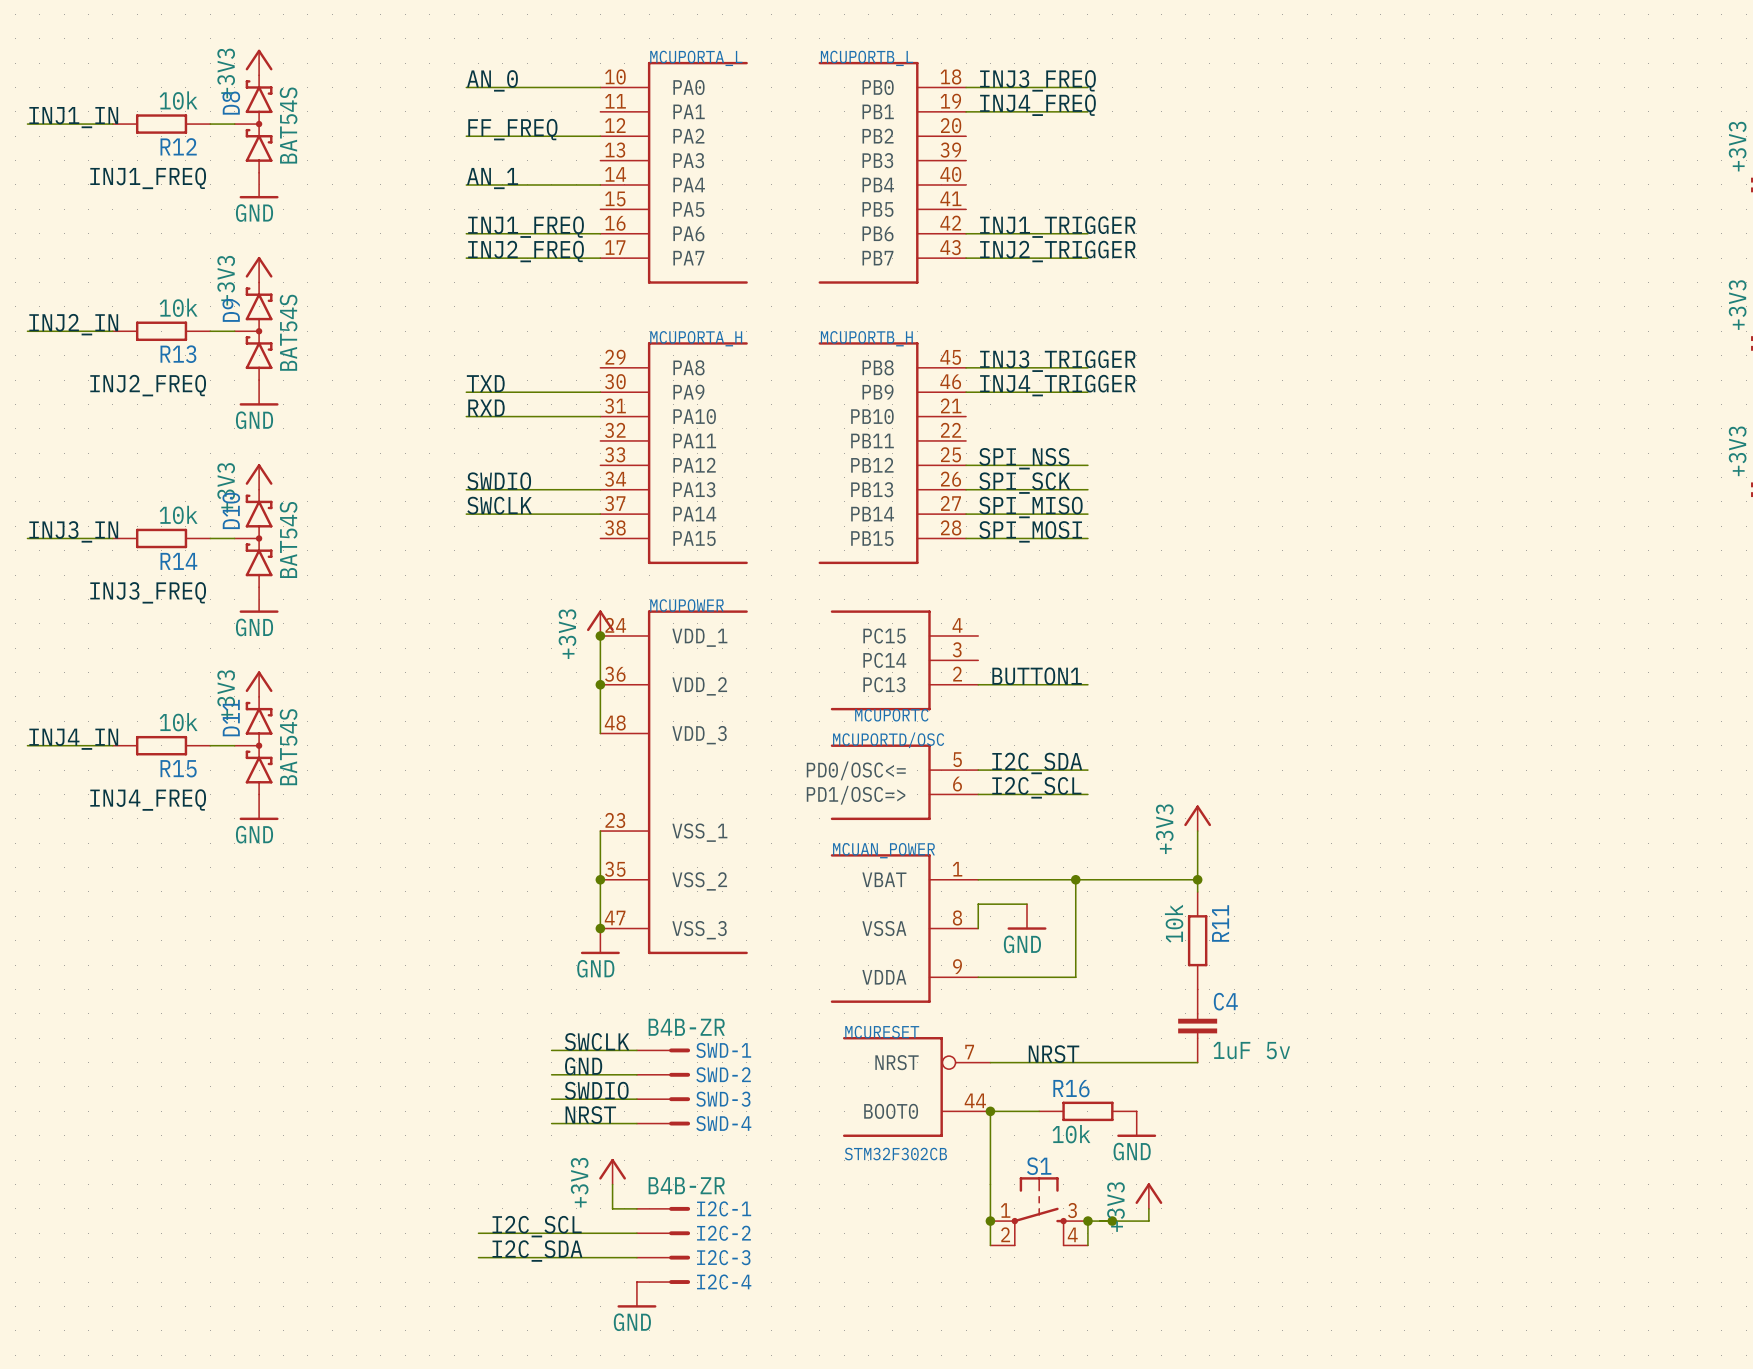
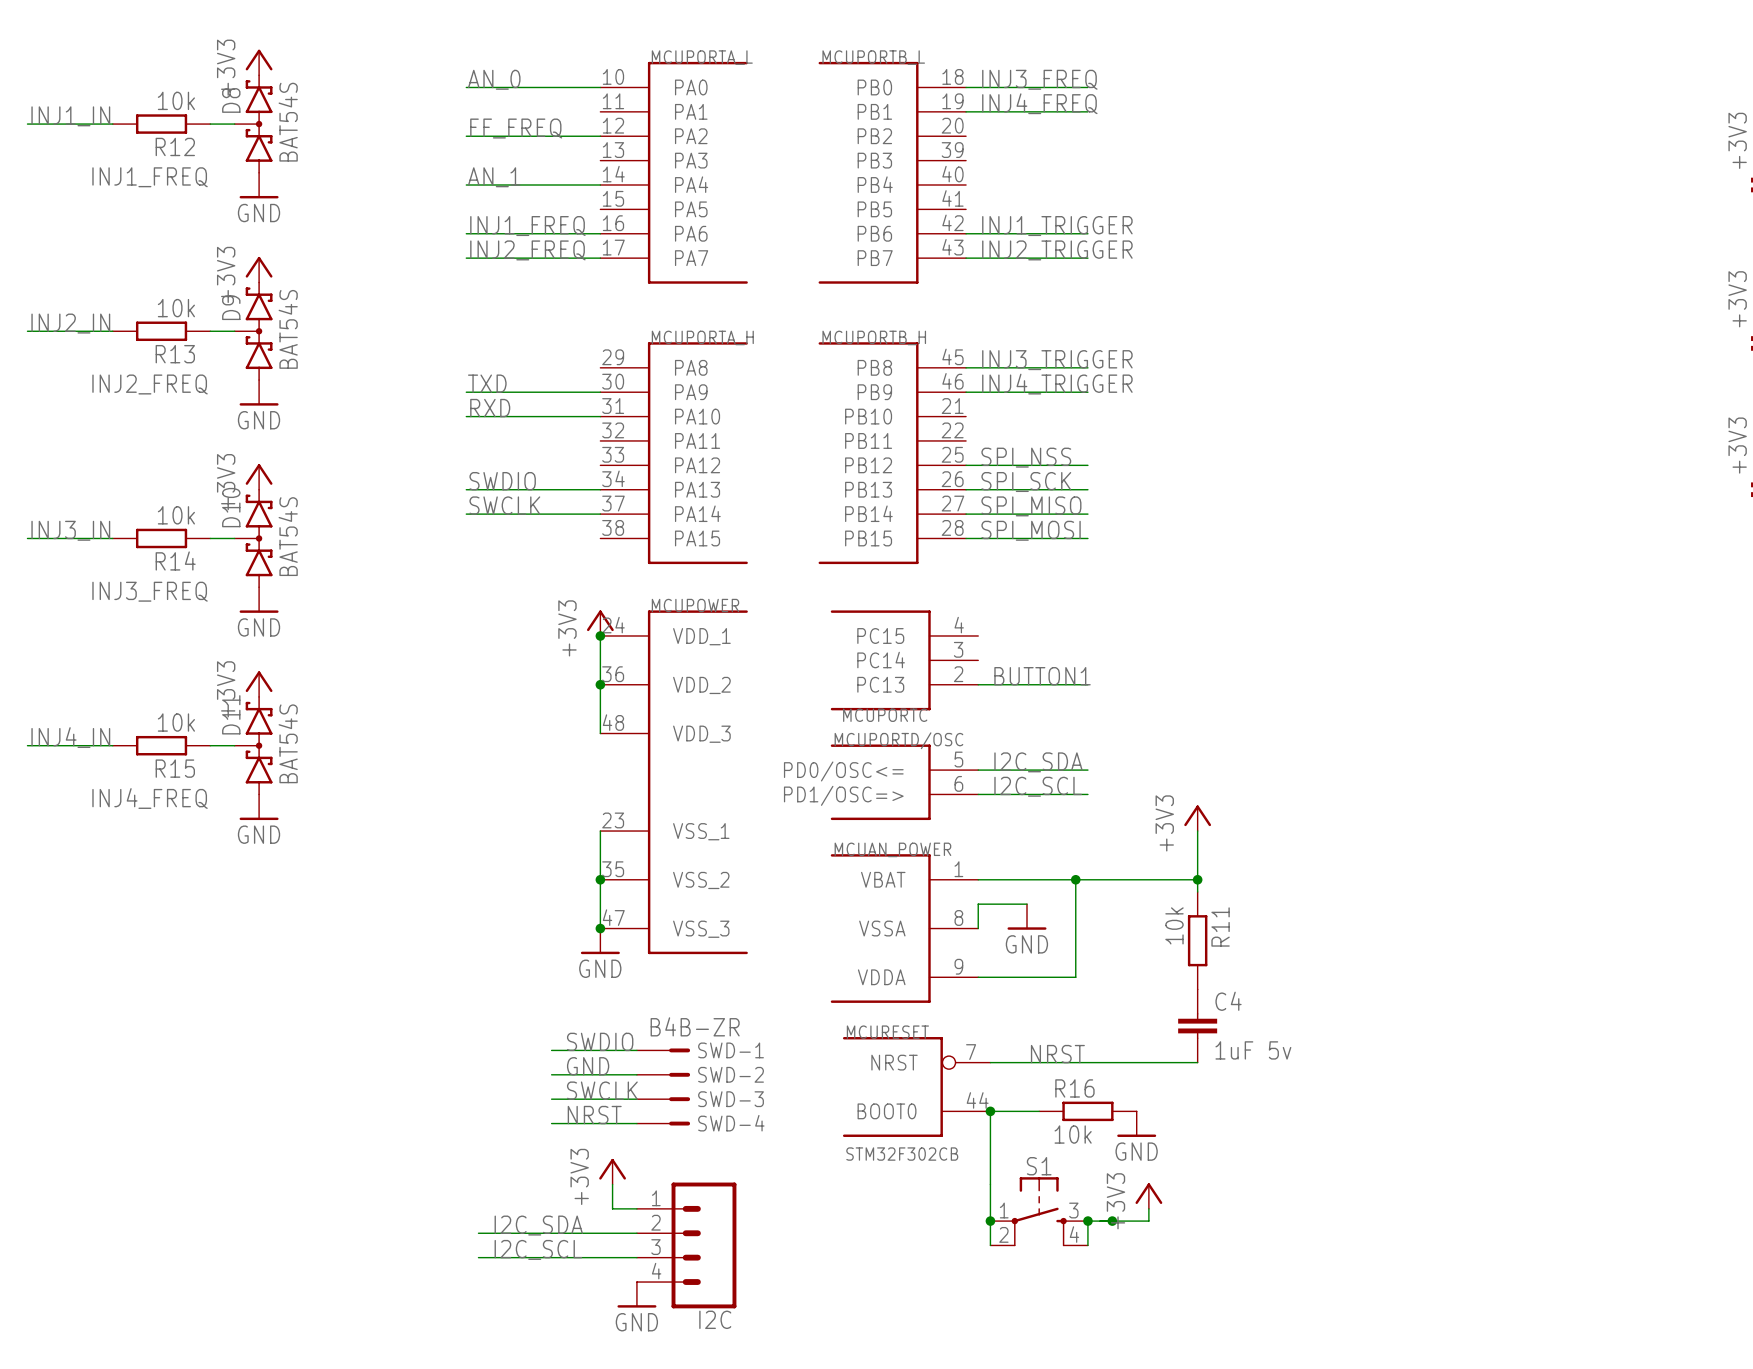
label: SWCLK (597, 1041) -> SWDIO (600, 1041)
label: SWDIO (596, 1090) -> SWCLK (602, 1090)
I2C-1: B4B-ZR (663, 1208) -> none
label: I2C_SCL (537, 1226) -> I2C_SDA (538, 1225)
I2C-2: (663, 1233) -> none
I2C: none -> (686, 1245)
label: I2C_SDA (537, 1251) -> I2C_SCL (538, 1249)
I2C-3: (663, 1257) -> none
I2C-4: (663, 1282) -> none

